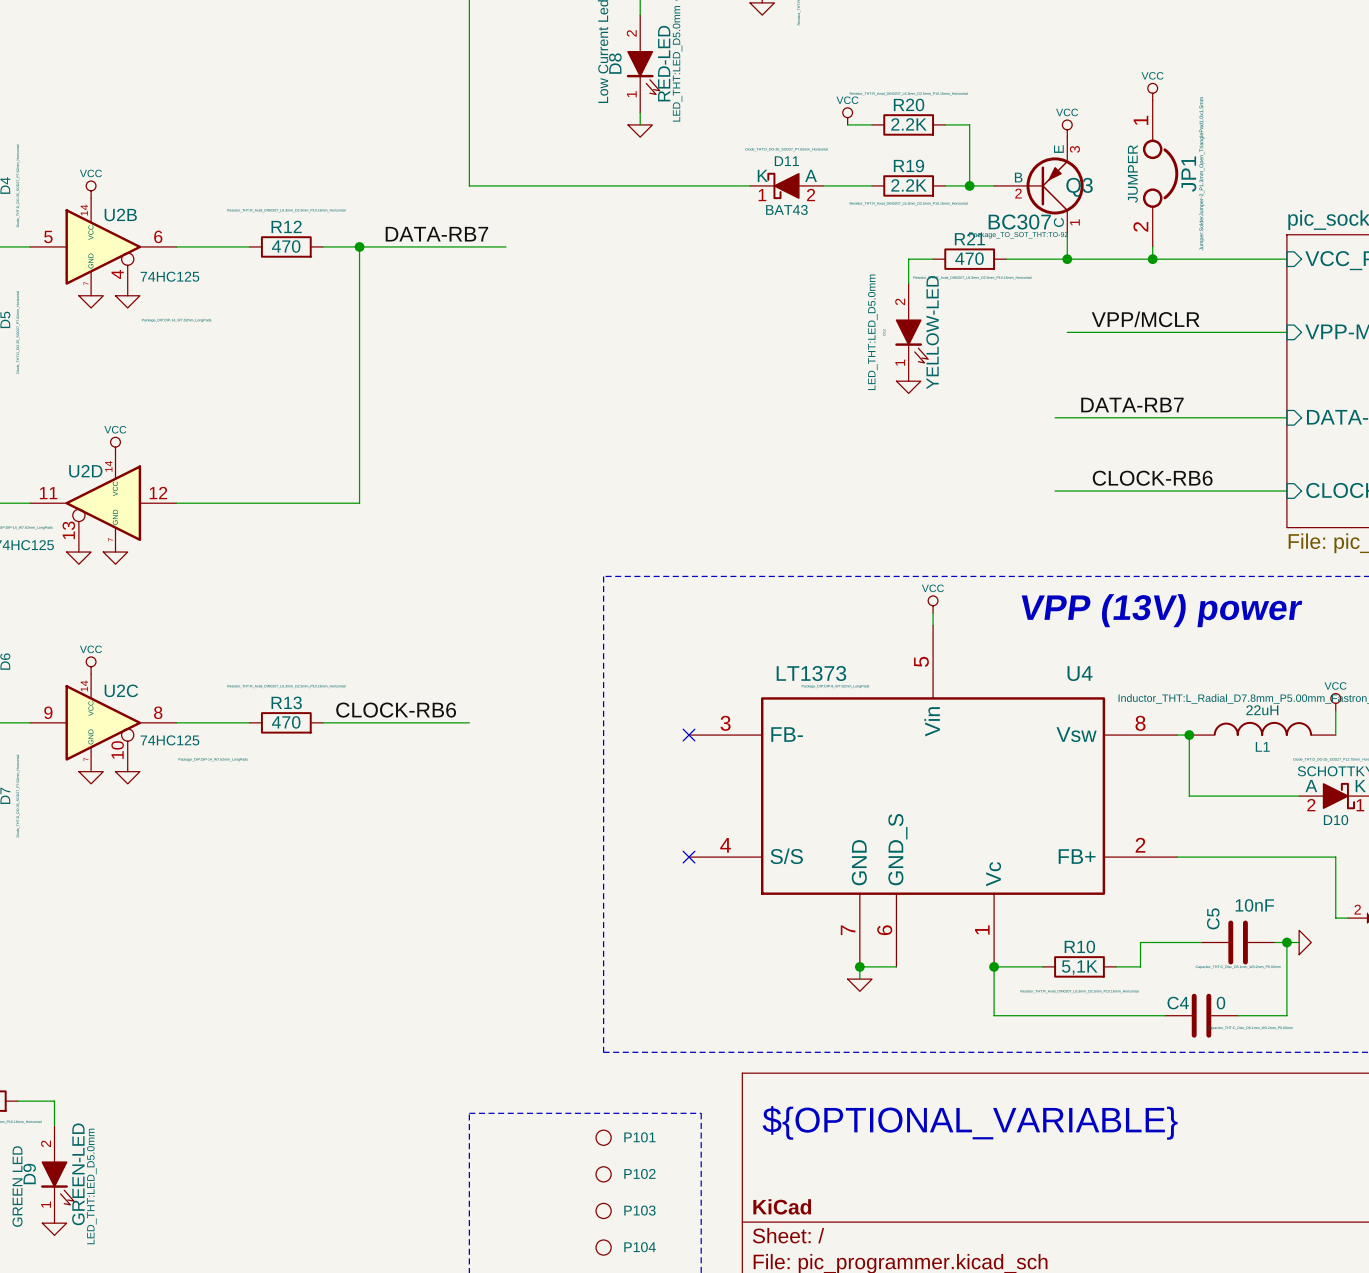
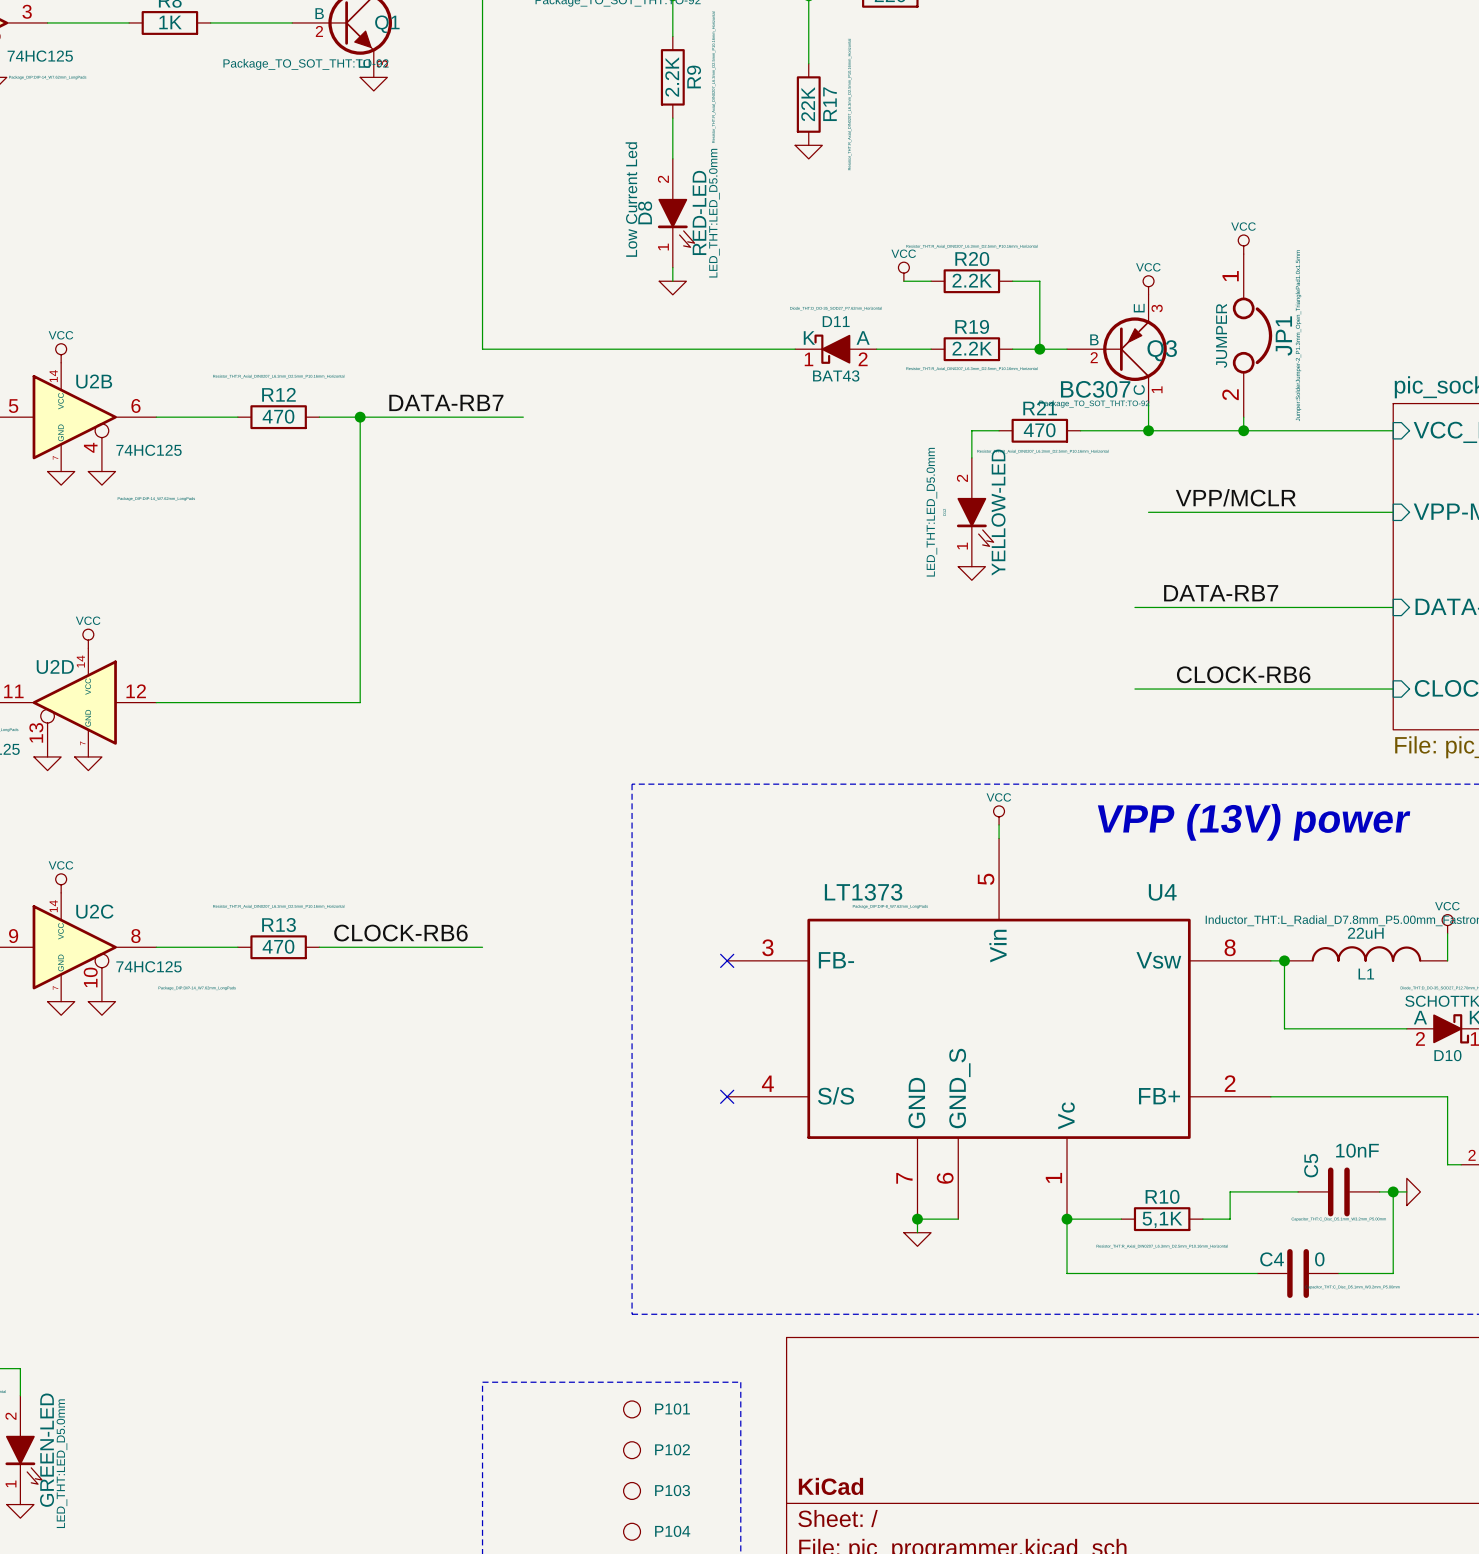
text: ${OPTIONAL_VARIABLE} (970, 1122) -> none

